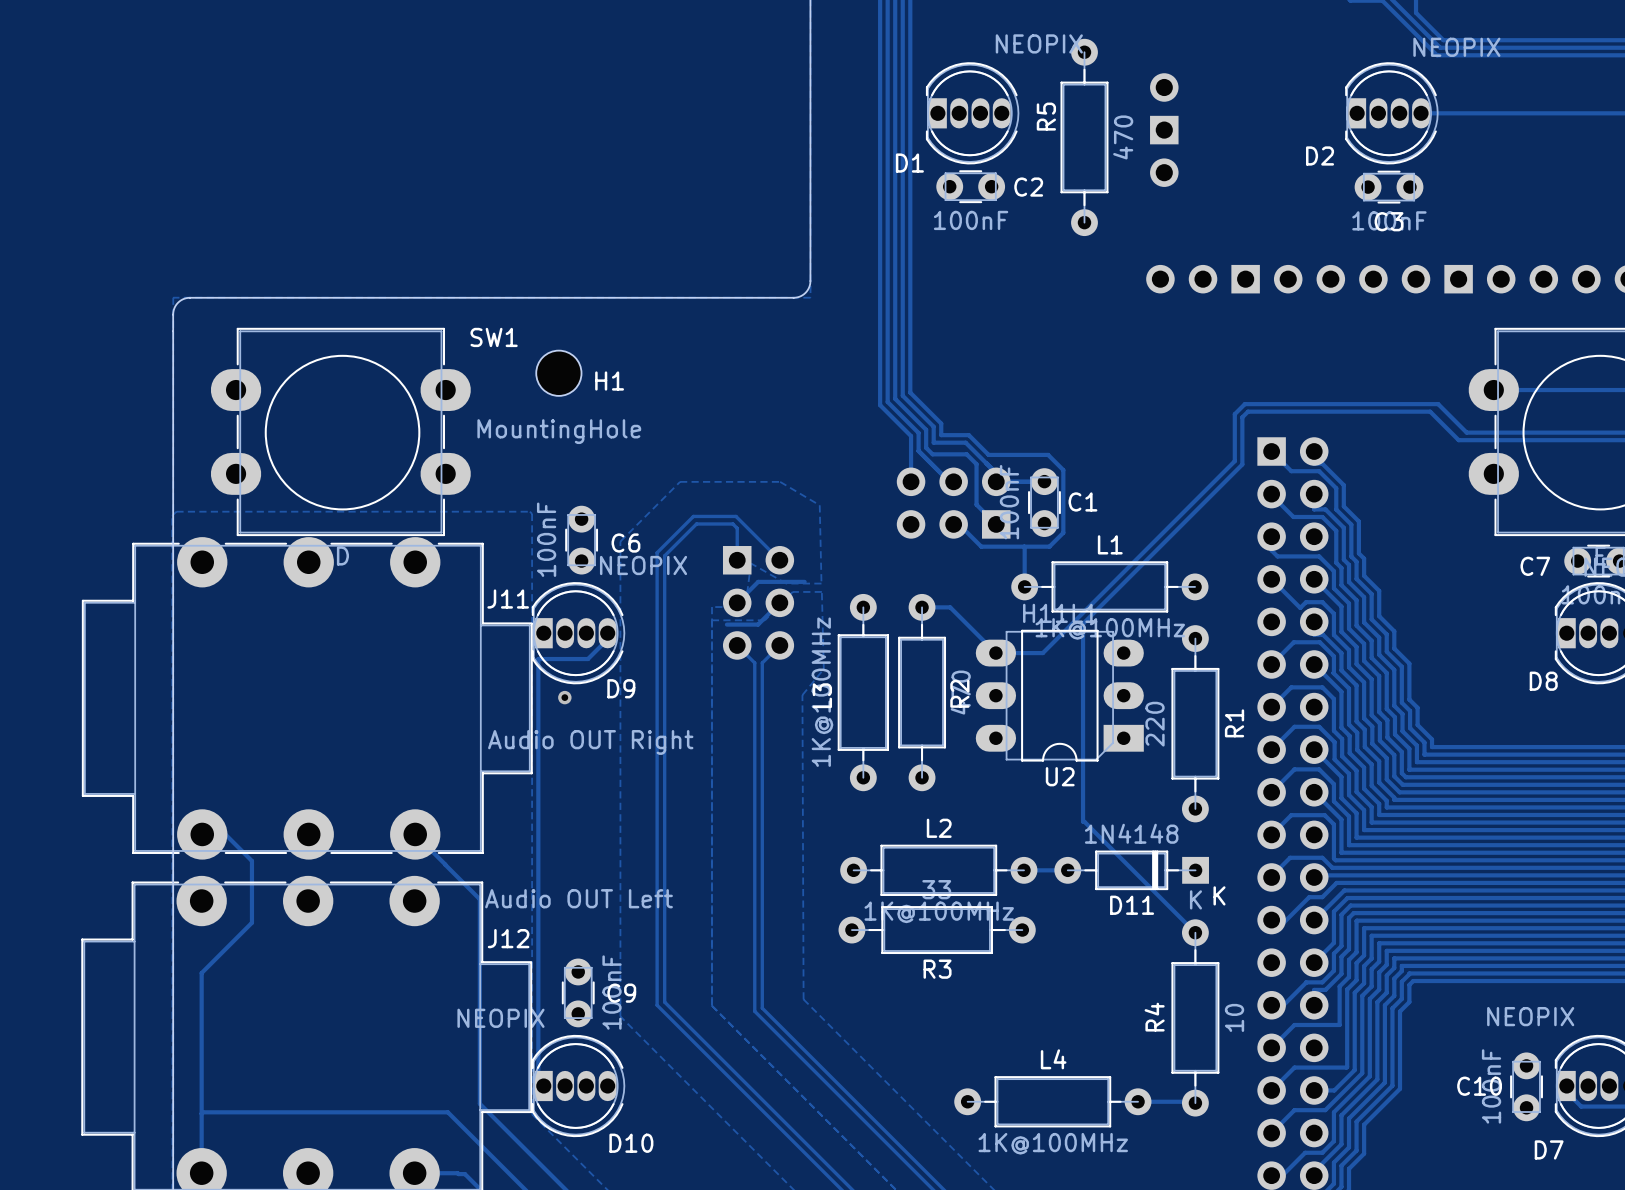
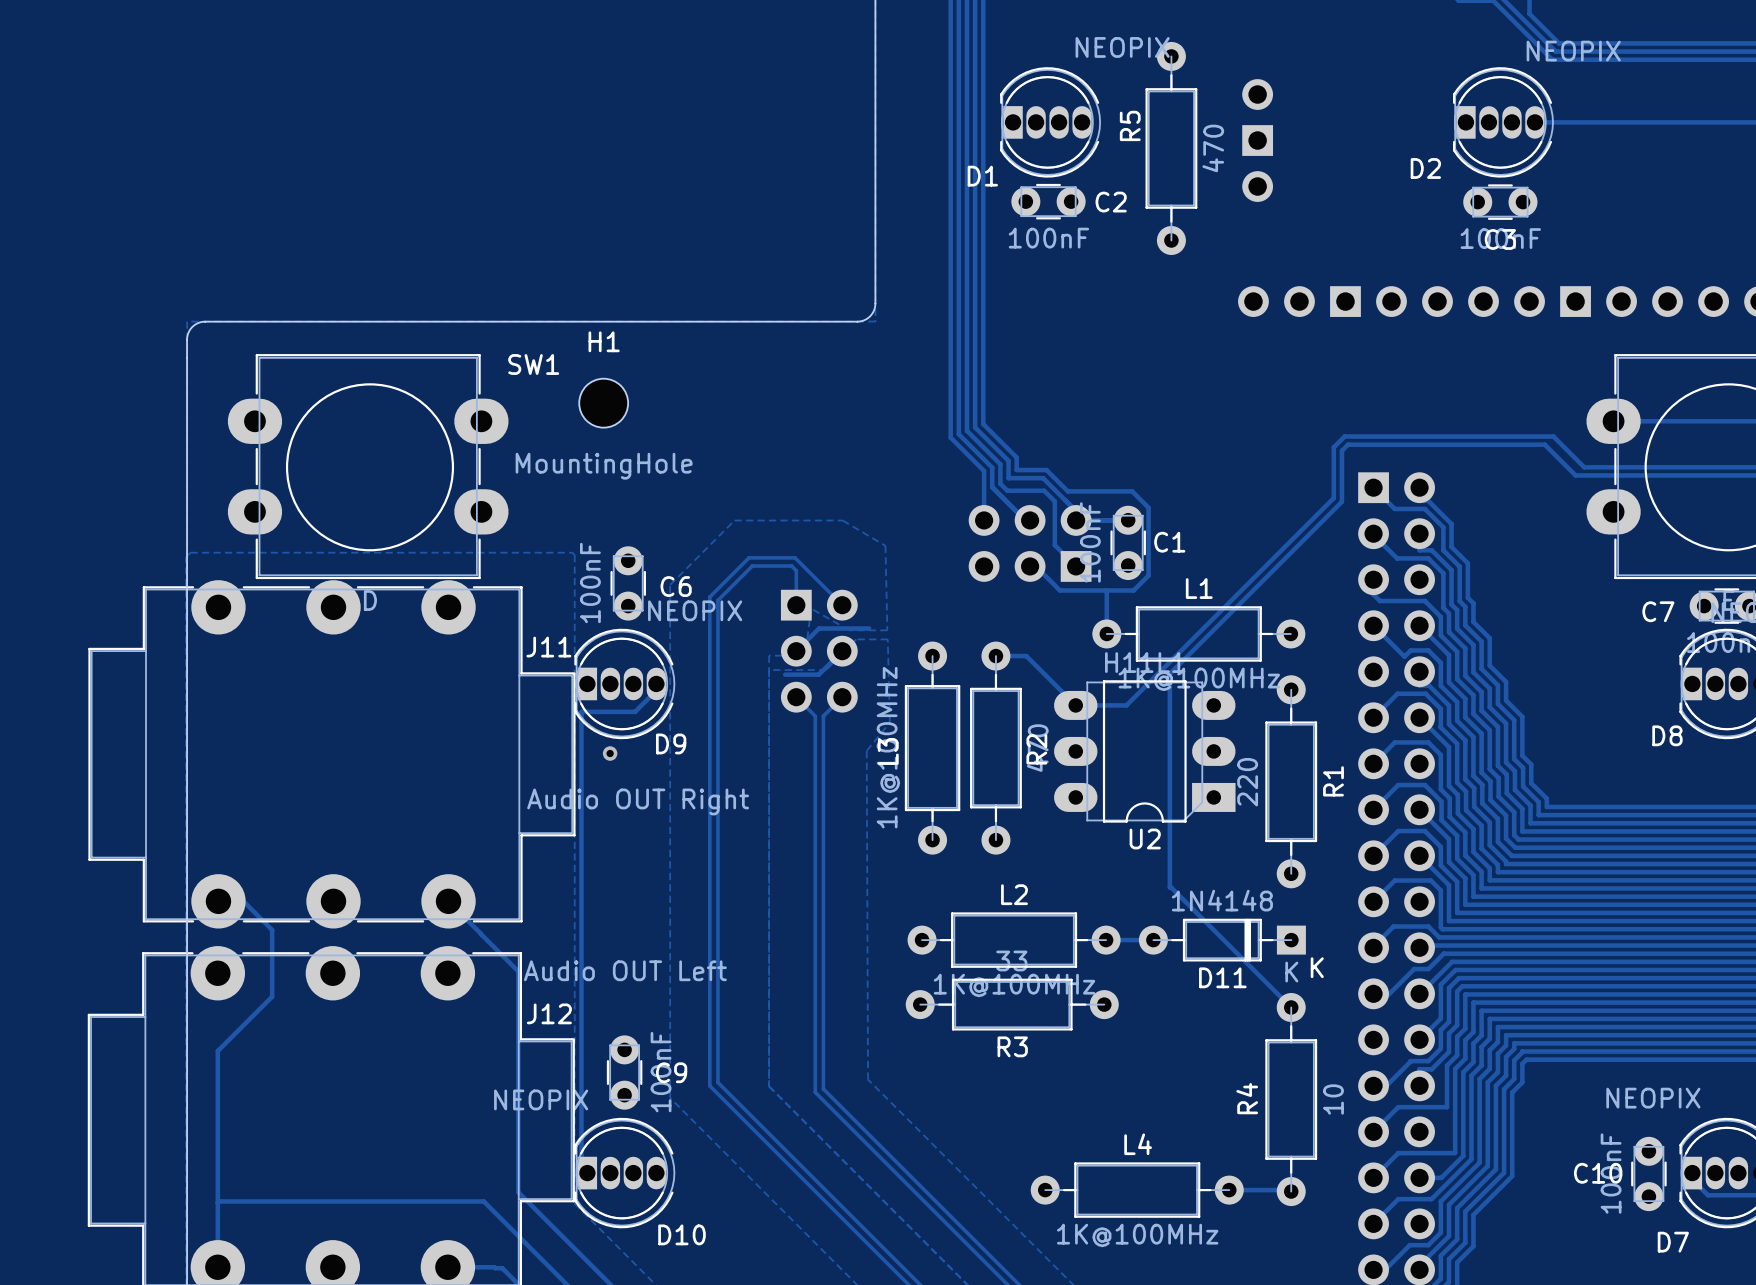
H1 name position: H1 (609, 381) -> H1 (604, 341)

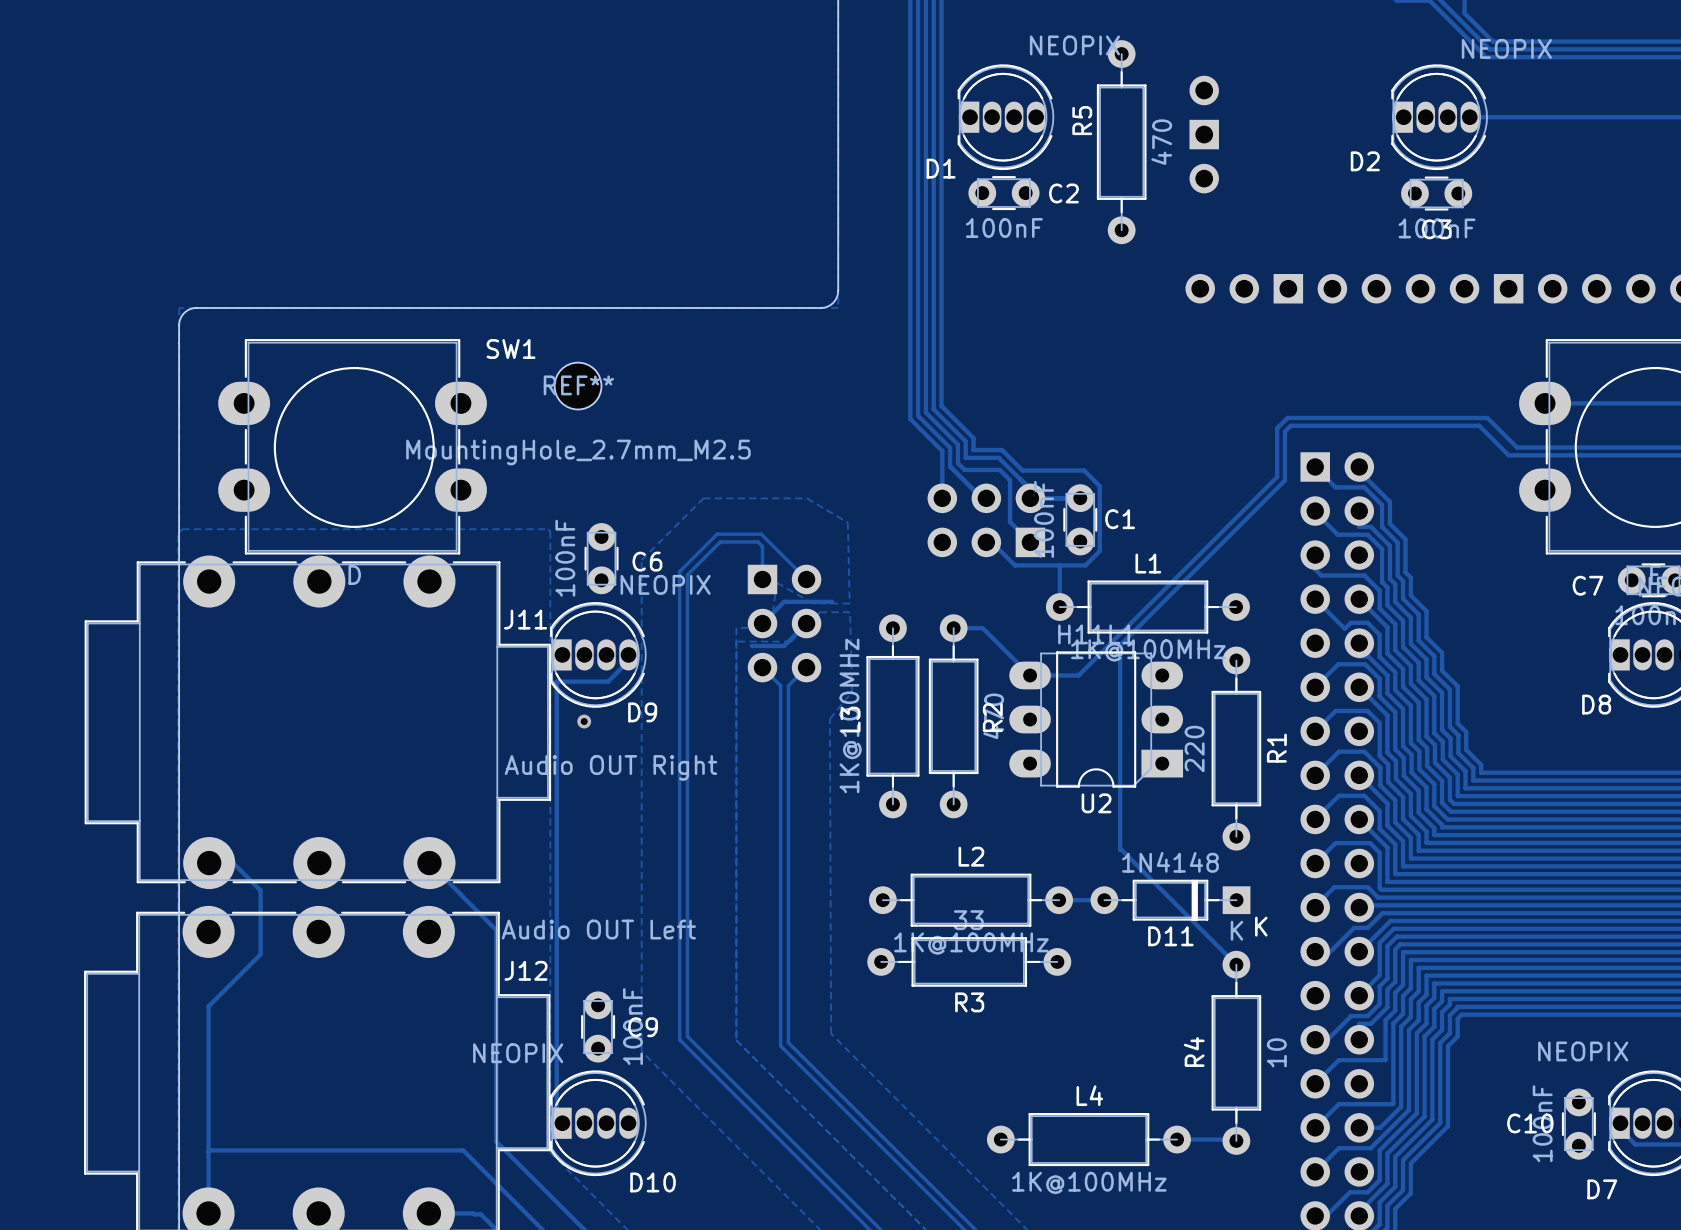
H1 name: H1 (604, 341) -> REF** (578, 385)
H1 value: MountingHole (604, 466) -> MountingHole_2.7mm_M2.5 (578, 452)

